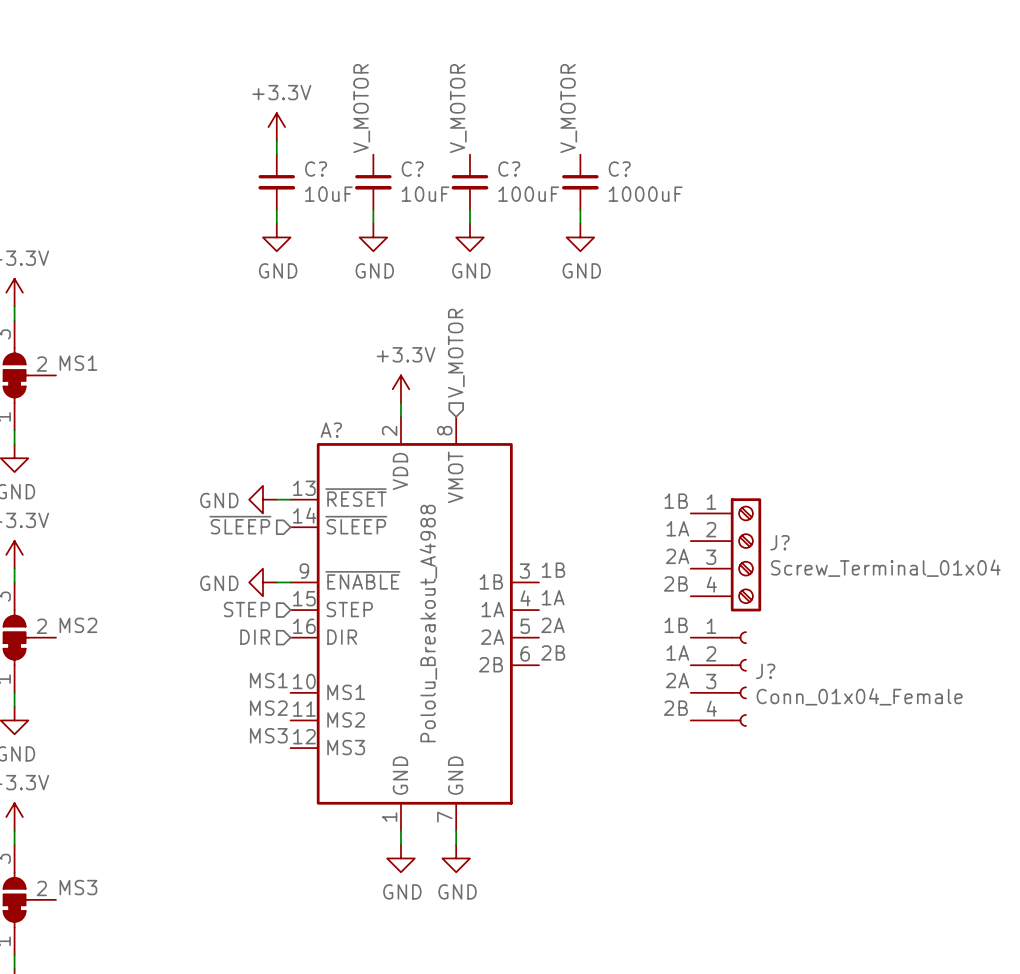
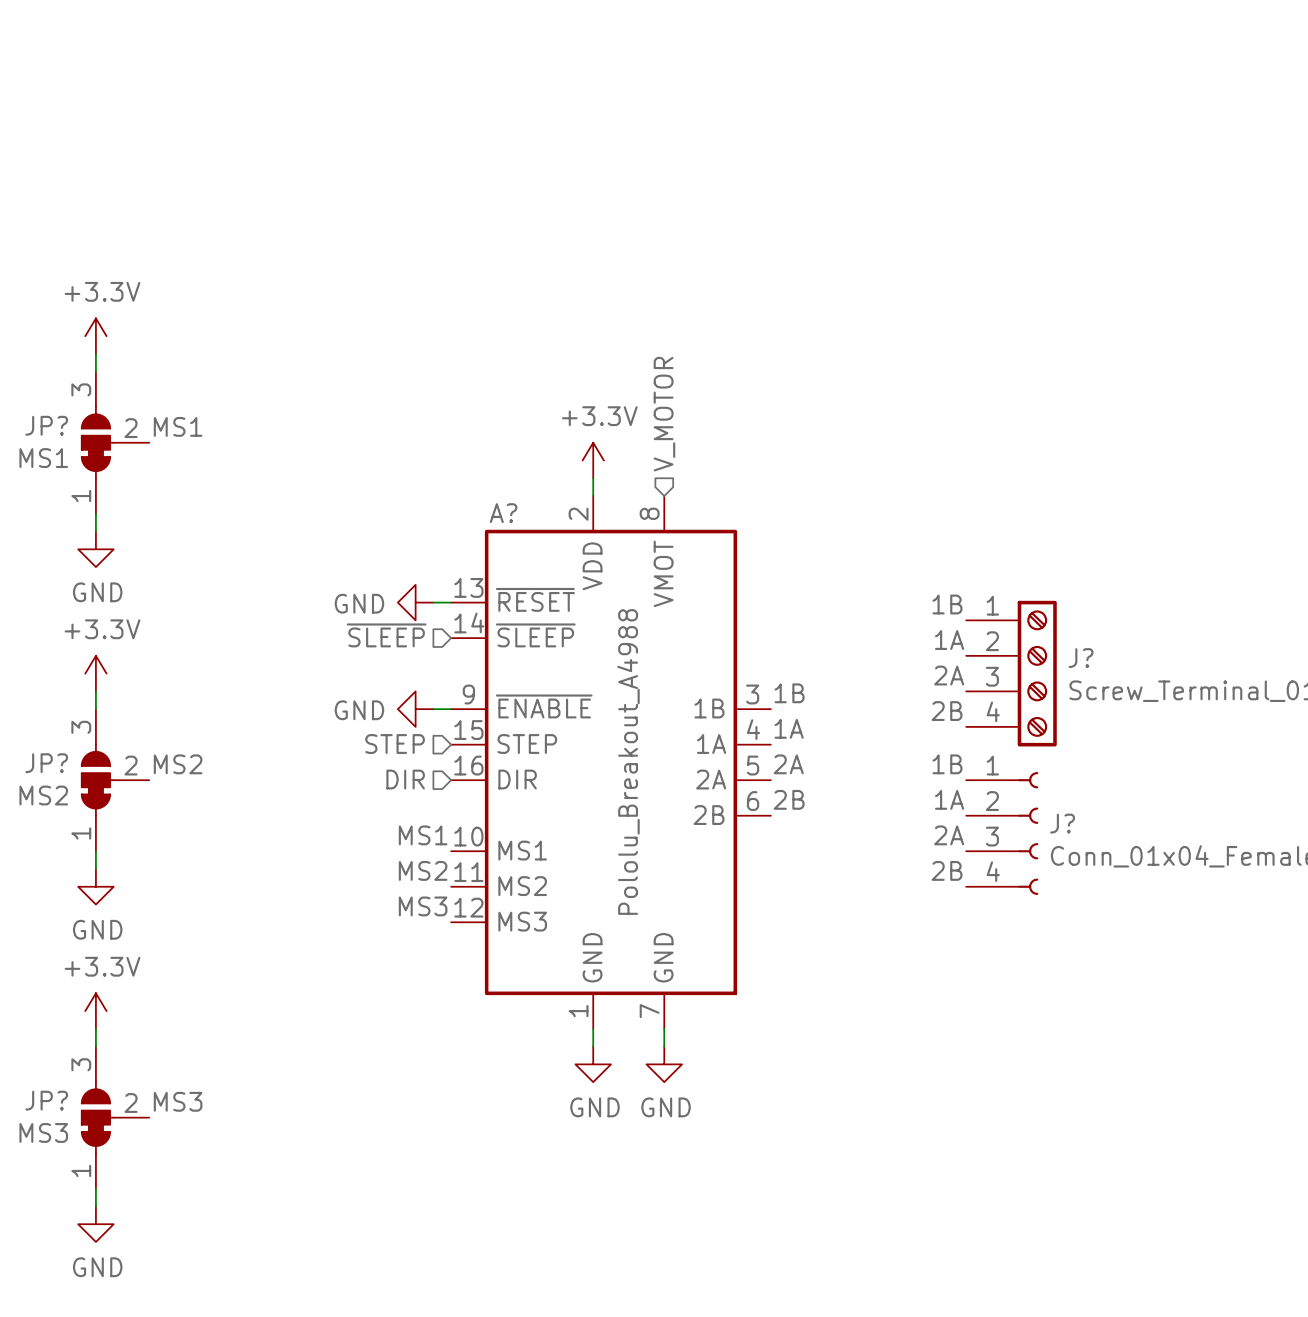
label: V_MOTOR (361, 108) -> none
label: V_MOTOR (458, 108) -> none
label: V_MOTOR (568, 108) -> none
power symbol: +3.3V (276, 127) -> none
wire: (276, 140) (276, 154) -> none
C?: 10uF (276, 182) -> none
C?: 10uF (373, 182) -> none
C?: 100uF (469, 182) -> none
C?: 1000uF (580, 182) -> none
wire: (276, 209) (276, 223) -> none
wire: (373, 209) (373, 223) -> none
wire: (469, 209) (469, 223) -> none
wire: (580, 209) (580, 223) -> none
power symbol: GND (276, 237) -> none
power symbol: GND (373, 237) -> none
power symbol: GND (469, 237) -> none
power symbol: GND (580, 237) -> none

